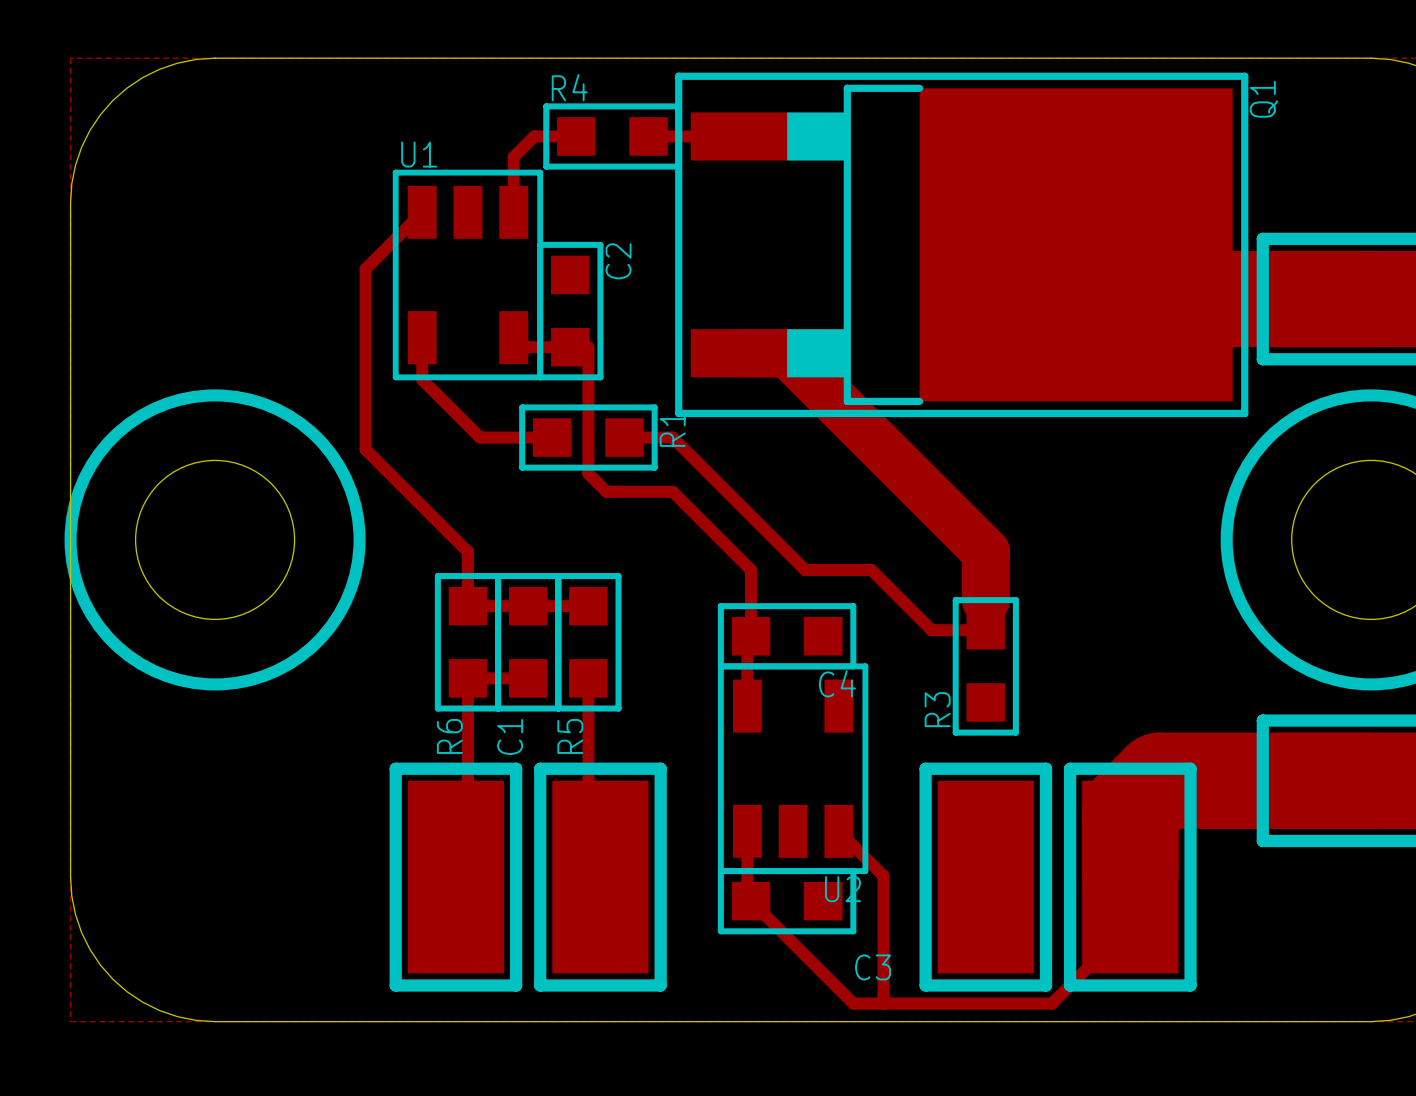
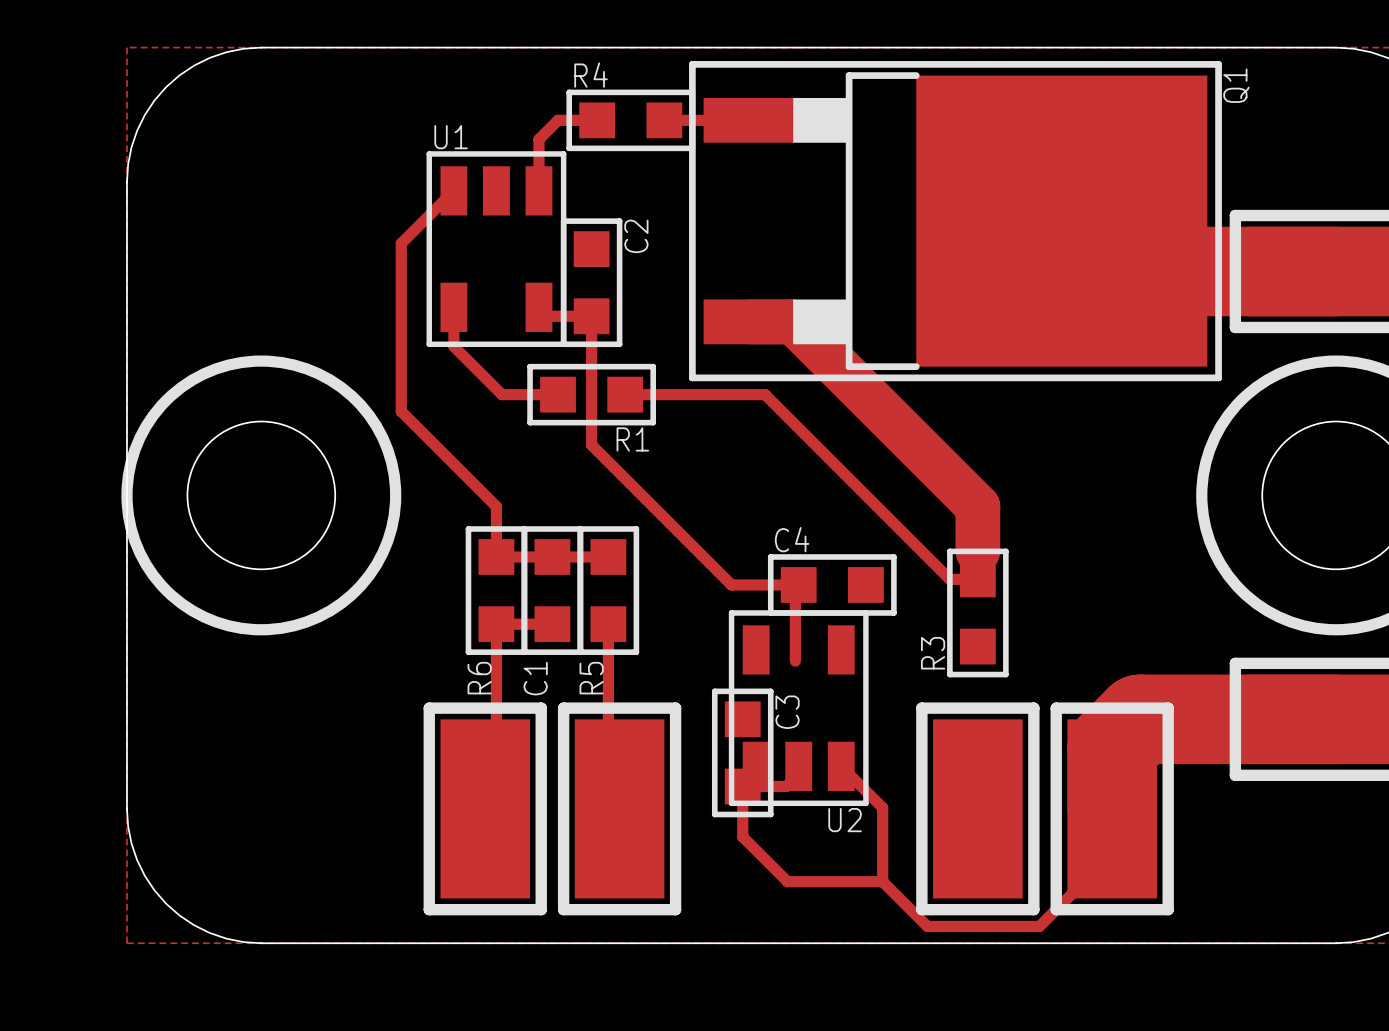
track: (570, 347) (588, 347) (588, 473) (606, 491) (672, 491) (750, 570) (750, 636) (747, 639) (747, 706) -> (591, 316) (591, 445) (731, 584) (798, 584) (795, 588) (795, 661)
R1 name rotation: 0° (672, 429) -> 90° clockwise (632, 439)
R1 name position: R1 (672, 429) -> R1 (632, 439)
track: (474, 431) (480, 437) (552, 437) -> (502, 394) (558, 394)
R1 position: (588, 437) -> (591, 394)
track: (624, 437) (672, 437) (805, 570) (871, 570) (931, 630) (955, 630) -> (625, 394) (765, 394) (949, 579)
C4 position: (787, 636) -> (832, 584)
C4 name position: C4 (837, 683) -> C4 (792, 539)
track: (747, 831) (747, 897) (853, 1003) (931, 1003) -> (795, 777) (786, 786) (742, 786) (742, 836) (787, 881) (882, 881) (927, 926)
C3 rotation: 0° (787, 901) -> 90° clockwise (742, 752)
C3 position: (787, 901) -> (742, 752)
track: (883, 955) (883, 1003) -> none
C3 name position: C3 (873, 967) -> C3 (787, 712)

